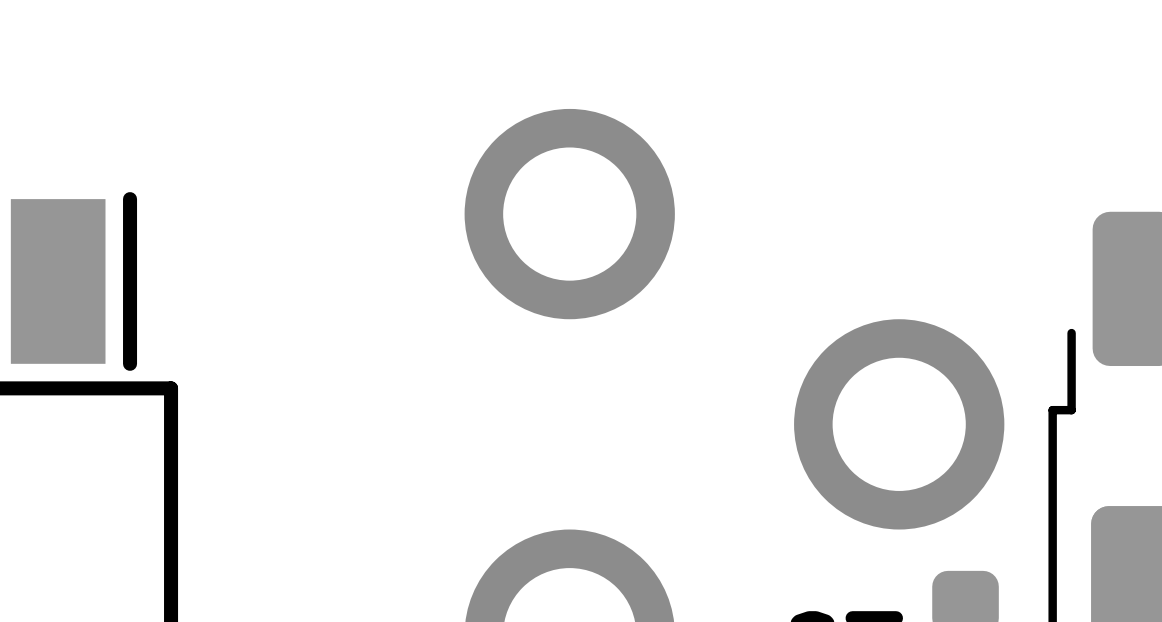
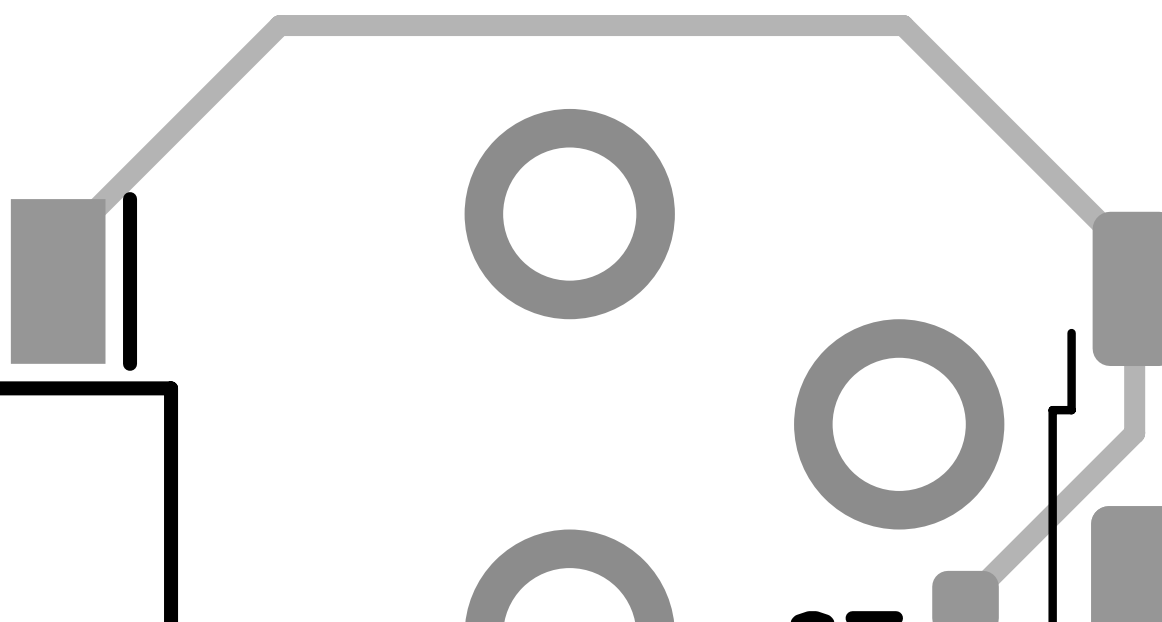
track: none -> (58, 281) (58, 247) (280, 25) (903, 25) (1134, 257) (1134, 433) (965, 602)

